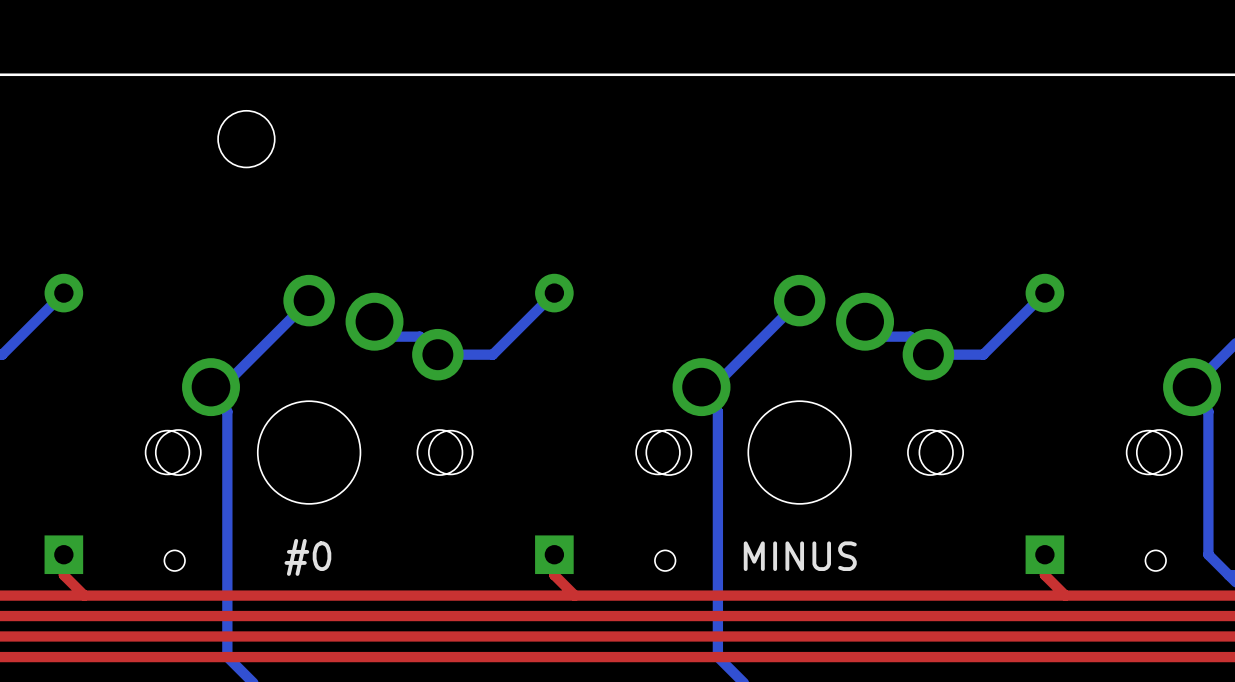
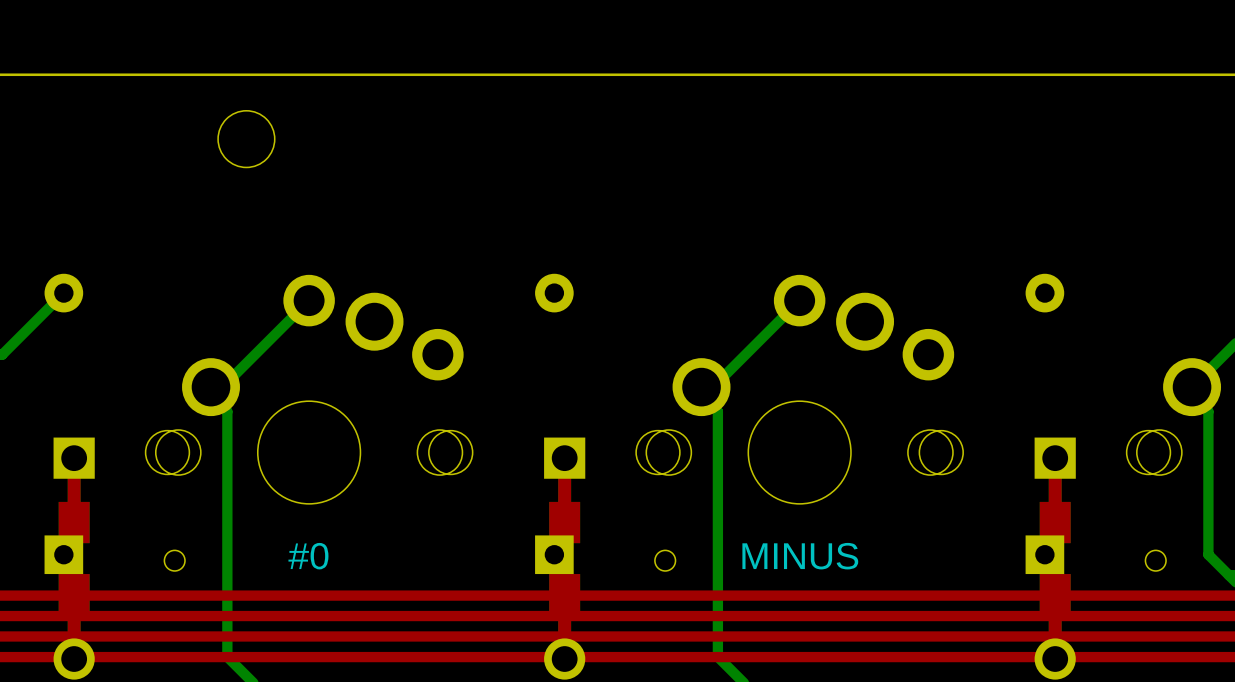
bottom track: (554, 293) (492, 354) (437, 354) (419, 336) (373, 336) -> none
bottom track: (1044, 293) (983, 354) (928, 354) (910, 336) (864, 336) -> none
top track: (63, 554) (63, 575) (84, 595) -> none
top track: (554, 554) (554, 575) (574, 595) -> none
top track: (1044, 554) (1044, 575) (1065, 595) -> none
part: none -> (74, 558)
part: none -> (564, 558)
part: none -> (1055, 558)

